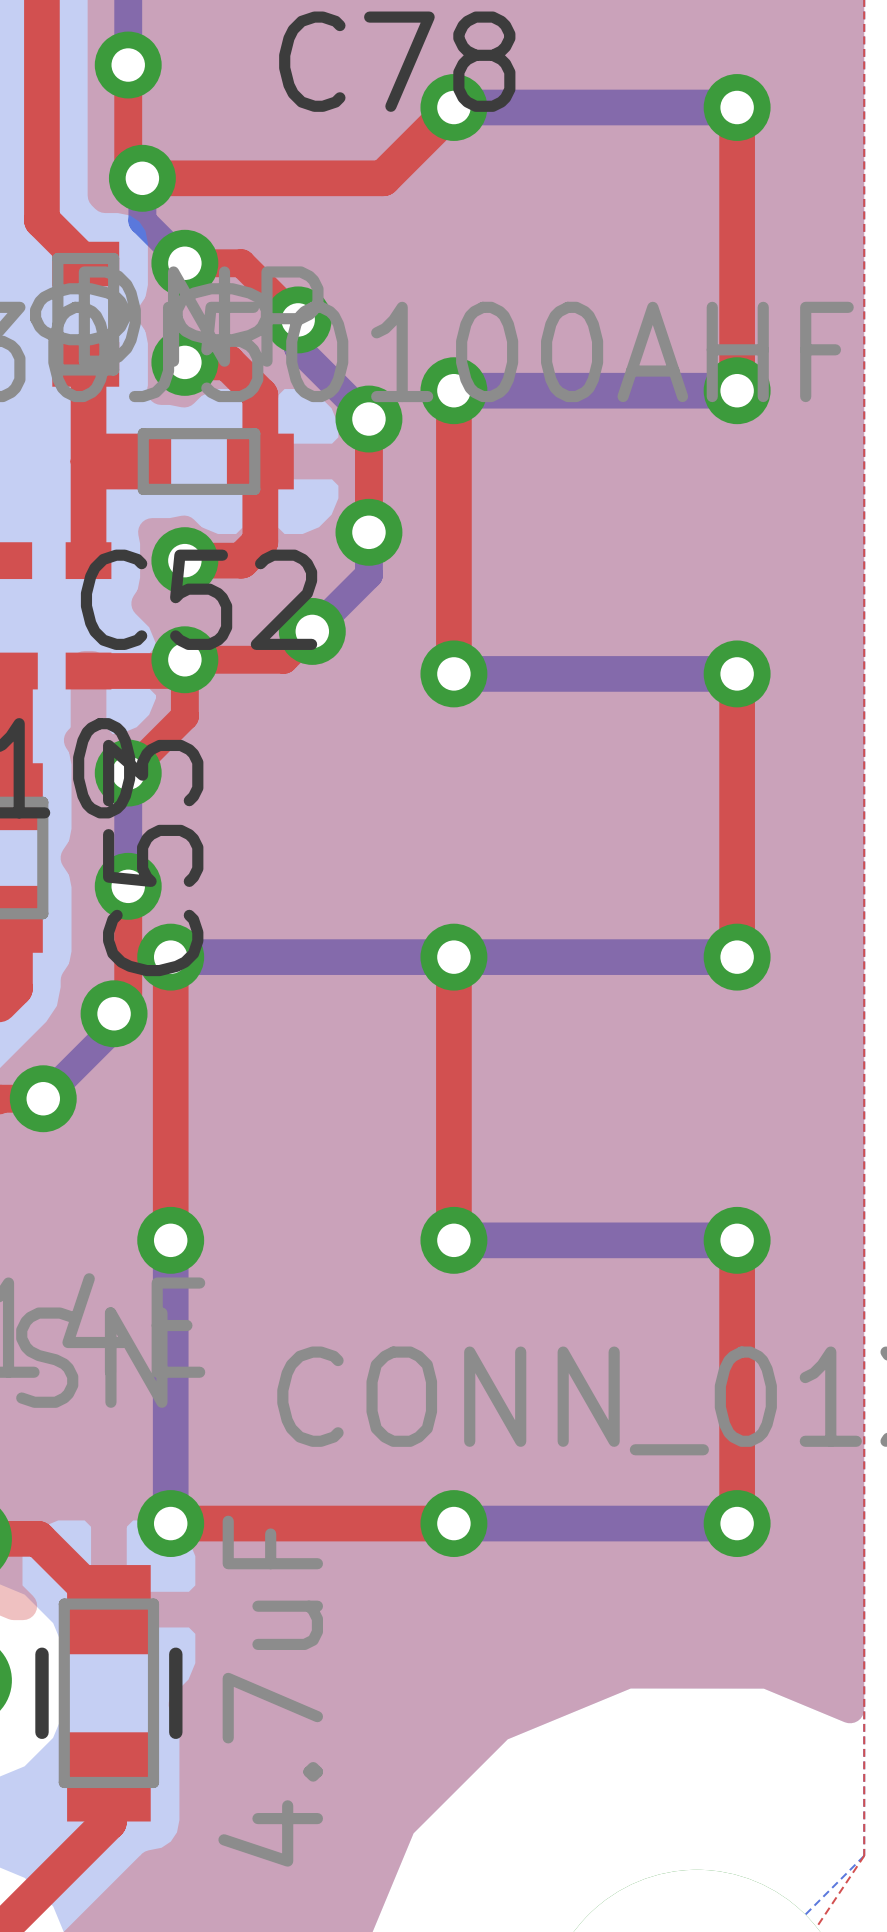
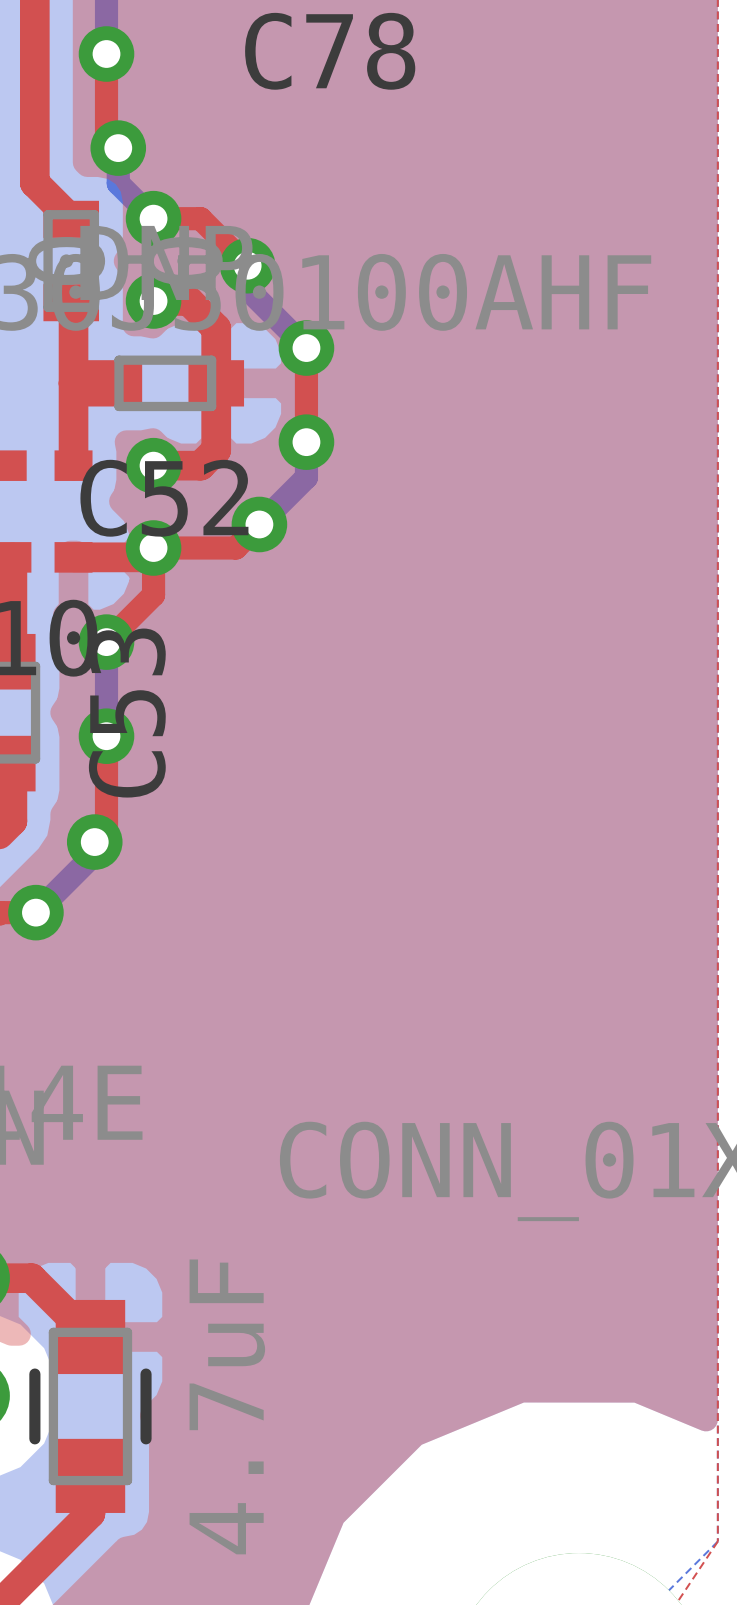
top track: (453, 107) (383, 178) (142, 178) -> none
bottom track: (453, 107) (737, 107) -> none
via: (453, 107) -> none
top track: (737, 107) (737, 390) -> none
via: (737, 107) -> none
top track: (453, 390) (453, 673) -> none
bottom track: (453, 390) (737, 390) -> none
via: (453, 390) -> none
via: (737, 390) -> none
bottom track: (453, 673) (737, 673) -> none
via: (453, 673) -> none
top track: (737, 673) (737, 957) -> none
via: (737, 673) -> none
top track: (170, 957) (170, 1240) -> none
bottom track: (170, 957) (737, 957) -> none
via: (170, 957) -> none
top track: (453, 957) (453, 1240) -> none
via: (453, 957) -> none
via: (737, 957) -> none
bottom track: (170, 1240) (170, 1523) -> none
via: (170, 1240) -> none
bottom track: (453, 1240) (737, 1240) -> none
via: (453, 1240) -> none
top track: (737, 1240) (737, 1523) -> none
via: (737, 1240) -> none
top track: (170, 1523) (453, 1523) -> none
via: (170, 1523) -> none
bottom track: (453, 1523) (737, 1523) -> none
via: (453, 1523) -> none
via: (737, 1523) -> none

